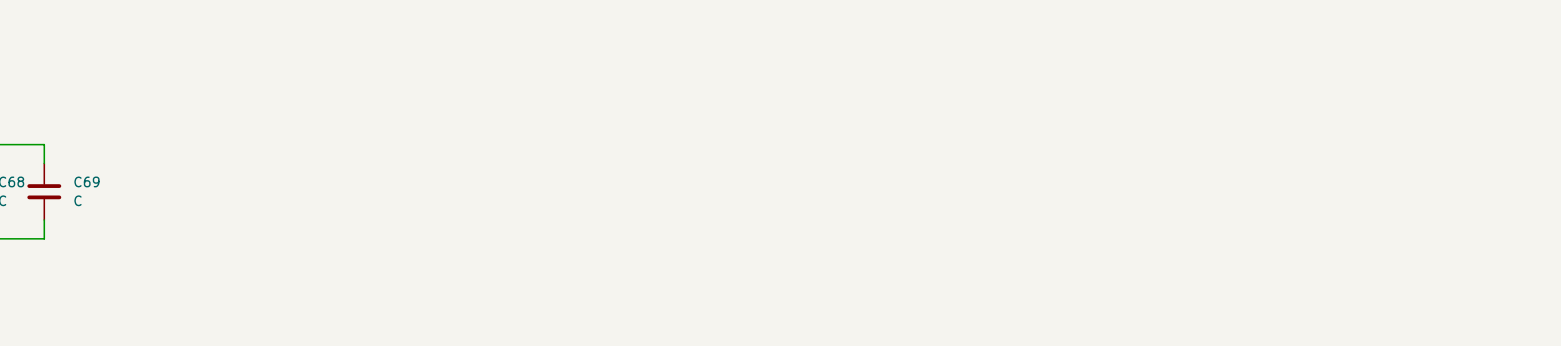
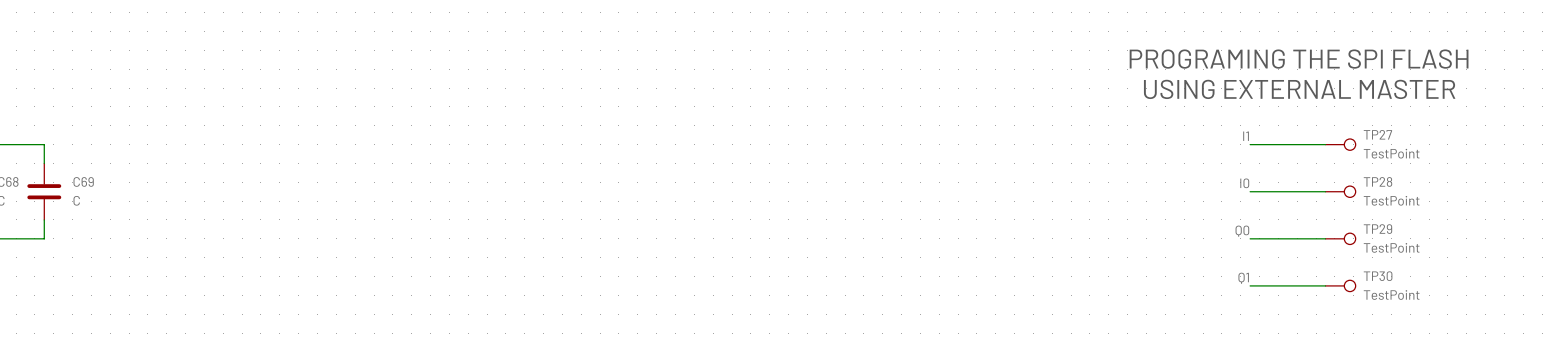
text: none -> PROGRAMING THE SPI FLASH (1299, 59)
text: none -> USING EXTERNAL MASTER (1299, 89)
label: none -> I1 (1246, 136)
wire: none -> (1250, 144) (1325, 144)
TP27: none -> TestPoint (1340, 144)
label: none -> I0 (1244, 183)
wire: none -> (1250, 191) (1325, 191)
TP28: none -> TestPoint (1340, 191)
label: none -> Q0 (1242, 231)
wire: none -> (1250, 238) (1325, 238)
TP29: none -> TestPoint (1340, 238)
label: none -> Q1 (1243, 278)
wire: none -> (1250, 285) (1325, 285)
TP30: none -> TestPoint (1340, 285)

